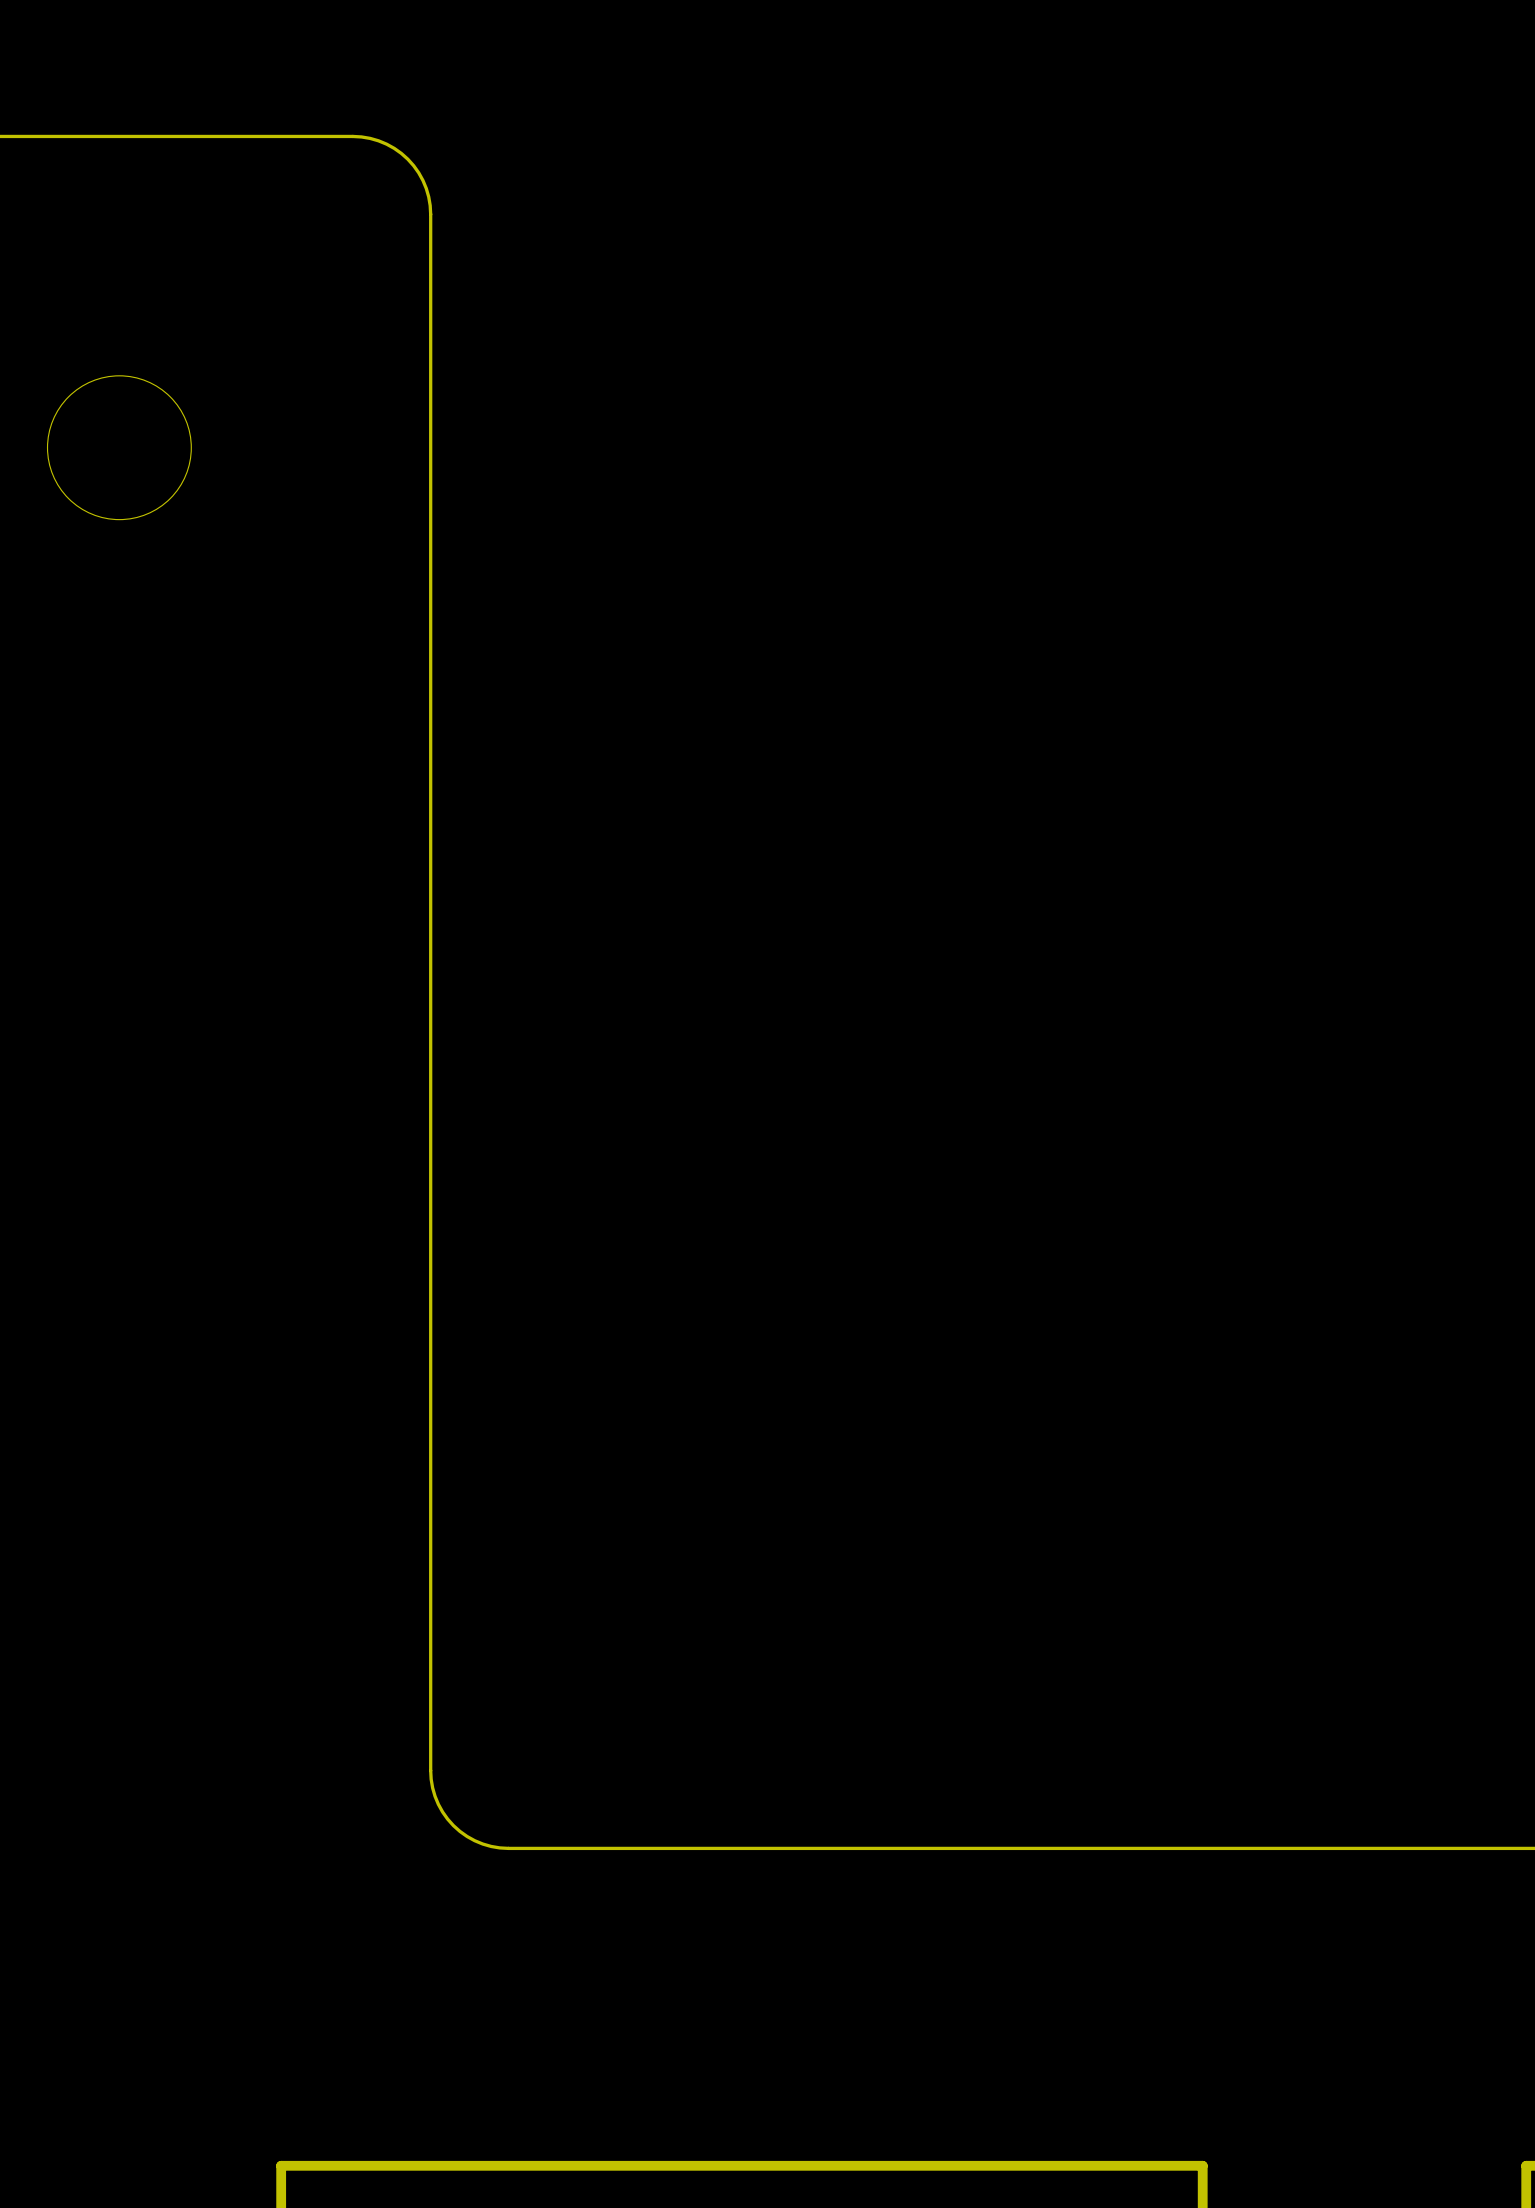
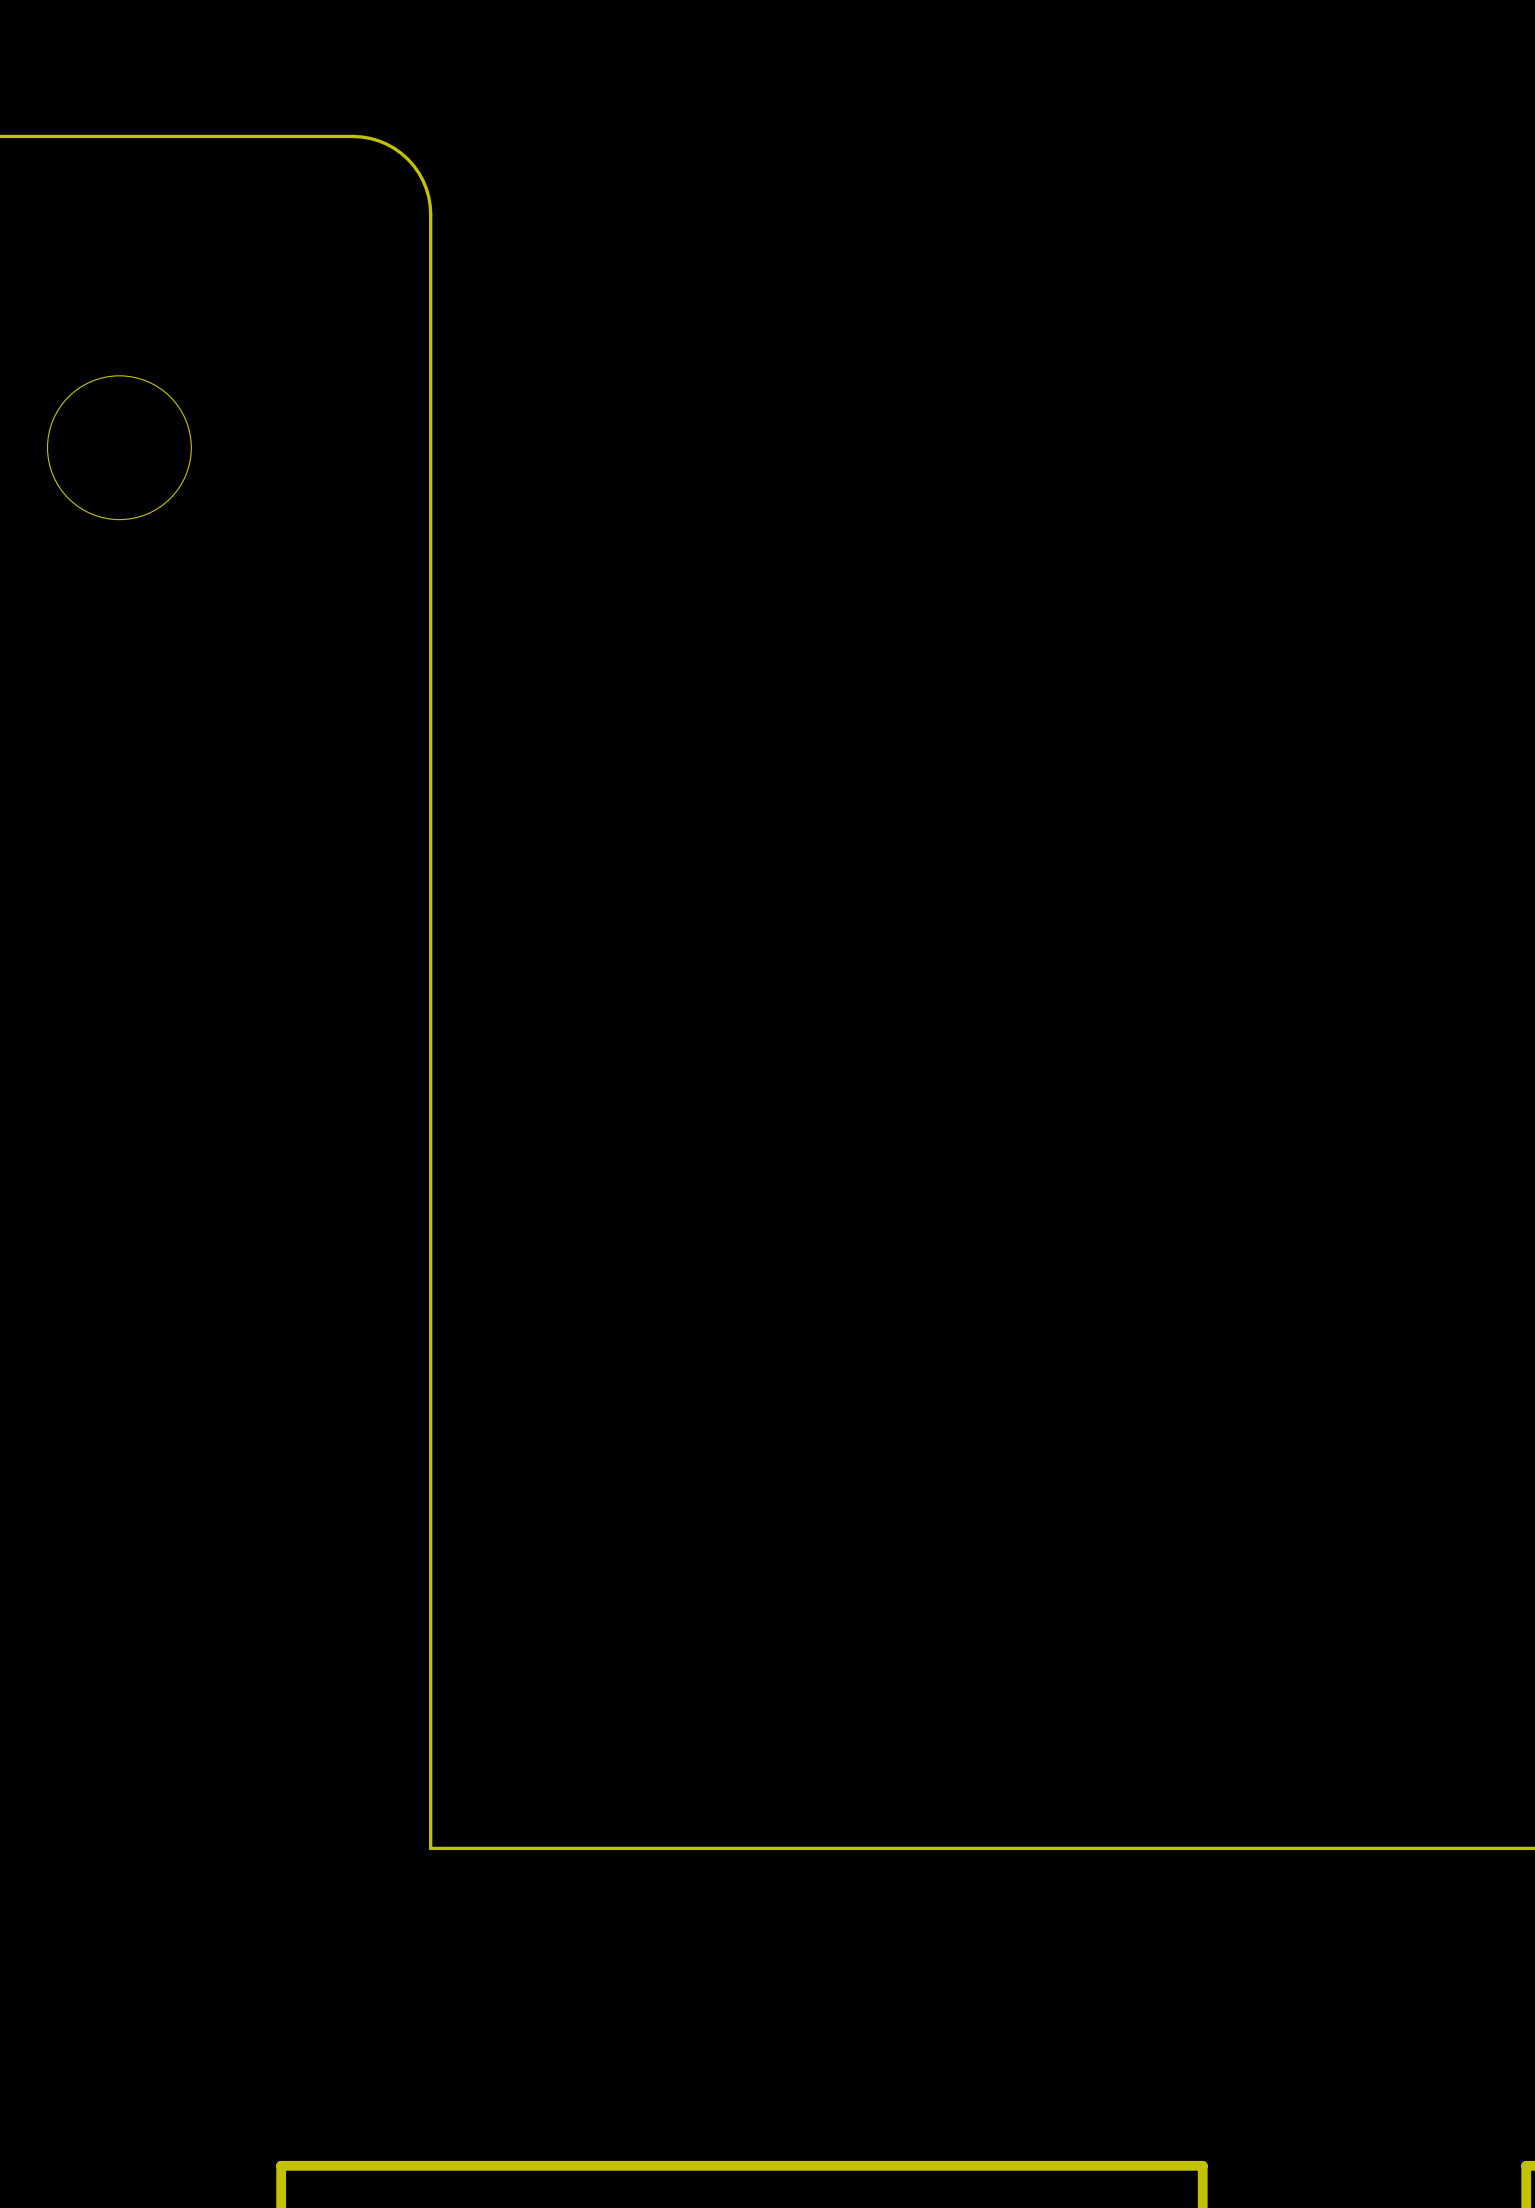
board edge: (430, 1770) (435, 1796) (442, 1811) (453, 1825) (467, 1836) (482, 1844) (508, 1848) -> (430, 1770) (430, 1848) (508, 1848)

